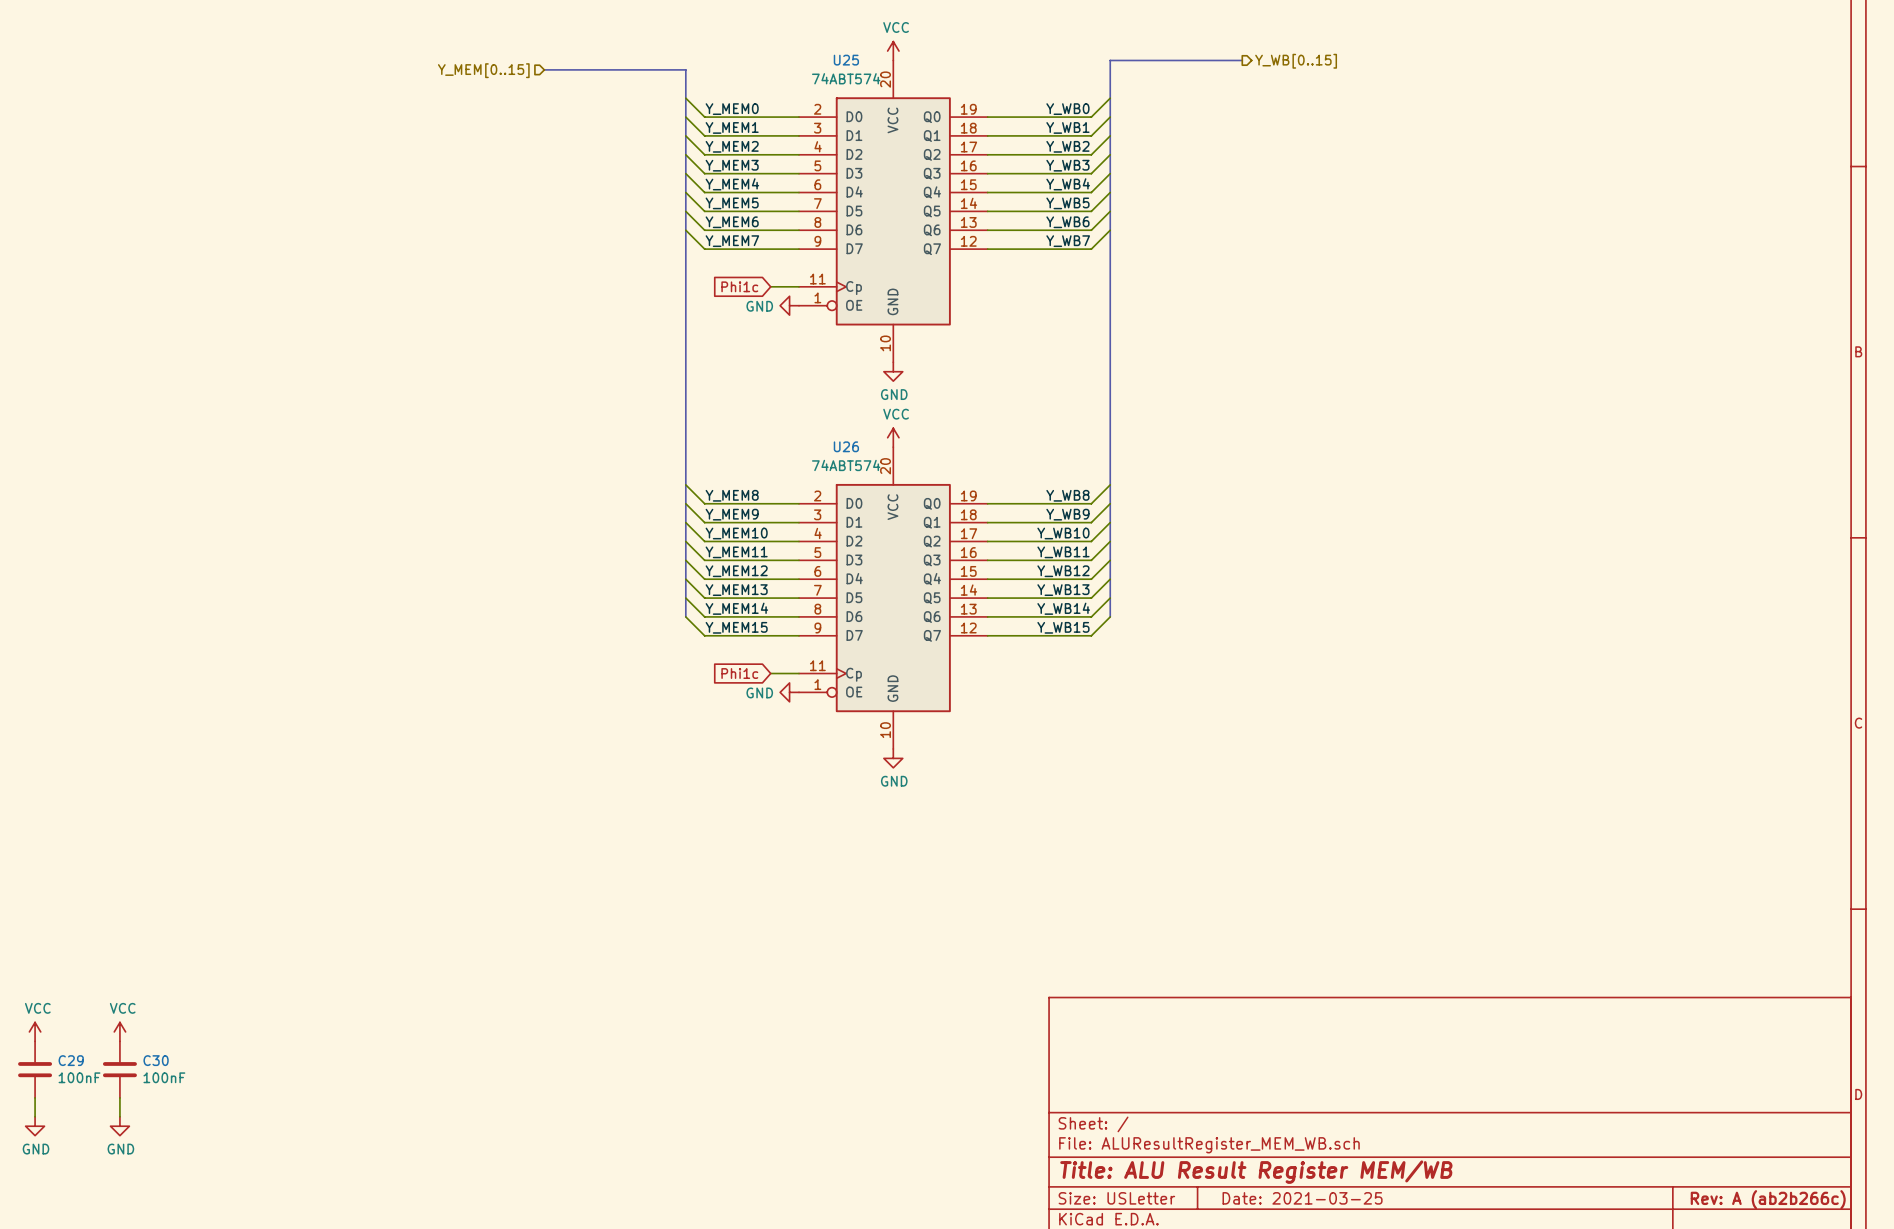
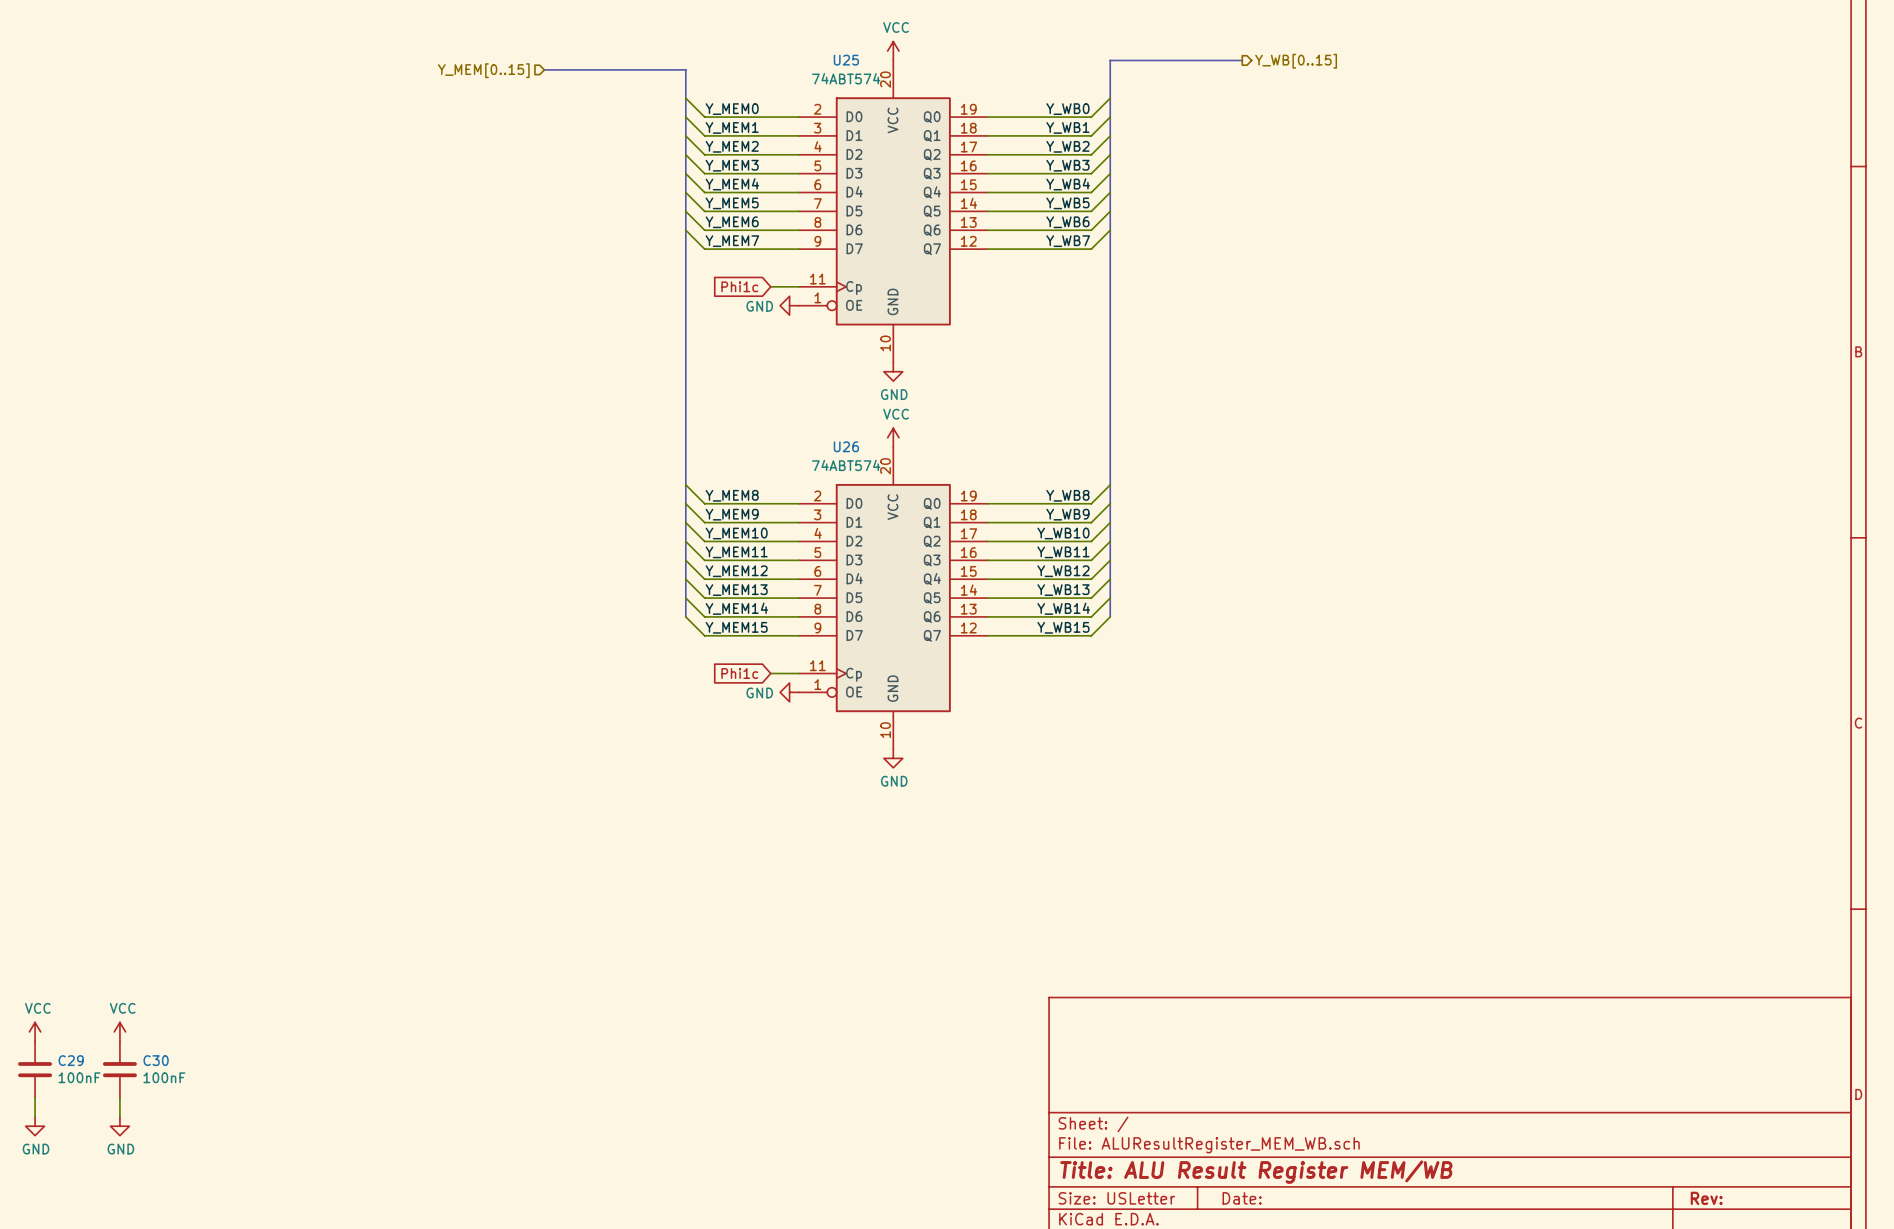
title block: Date: 2021-03-25 (1302, 1198) -> Date: (1242, 1198)
title block: Rev: A (ab2b266c) (1768, 1199) -> Rev: (1706, 1198)

